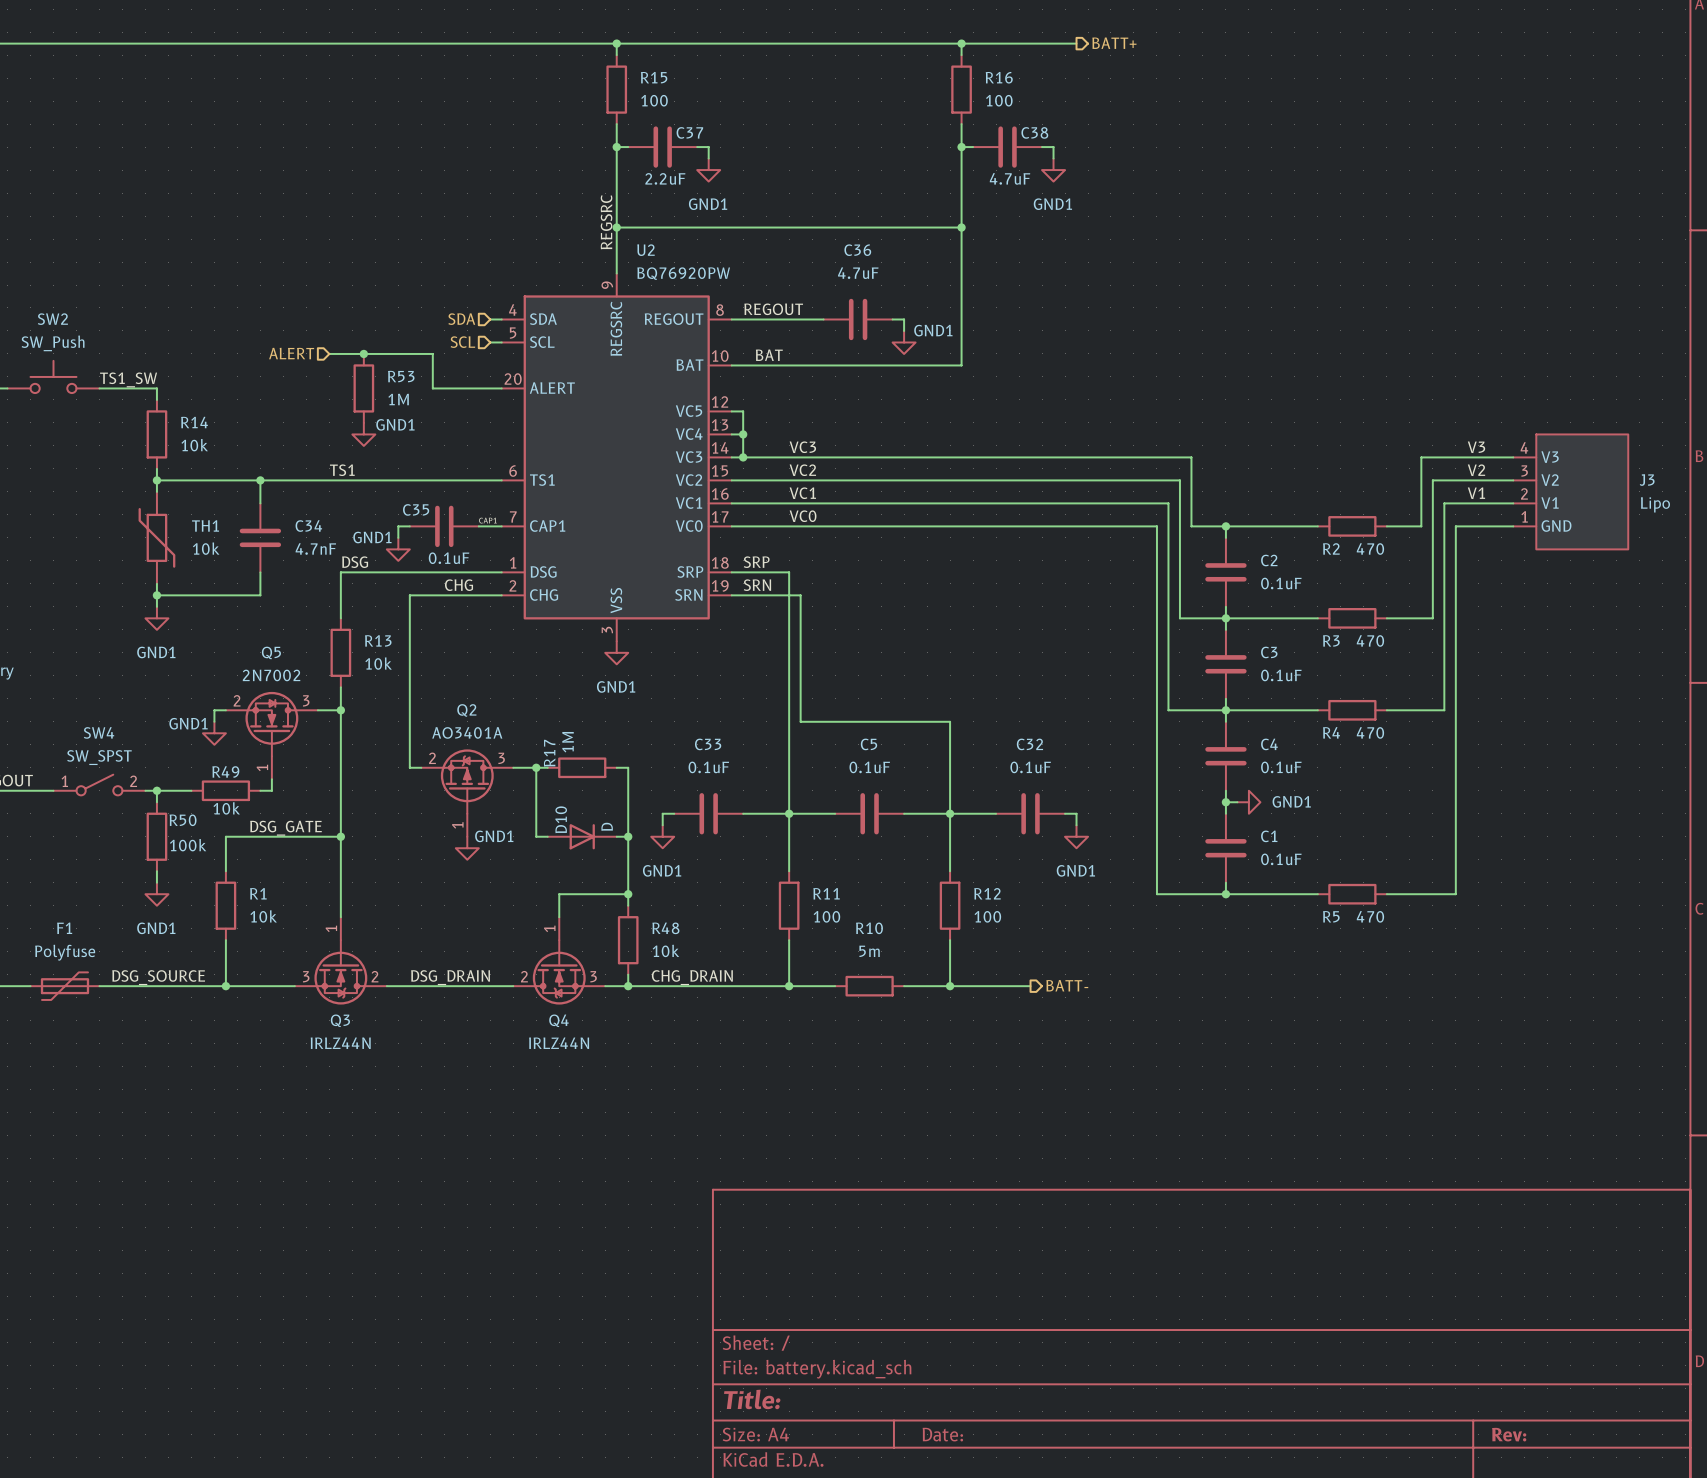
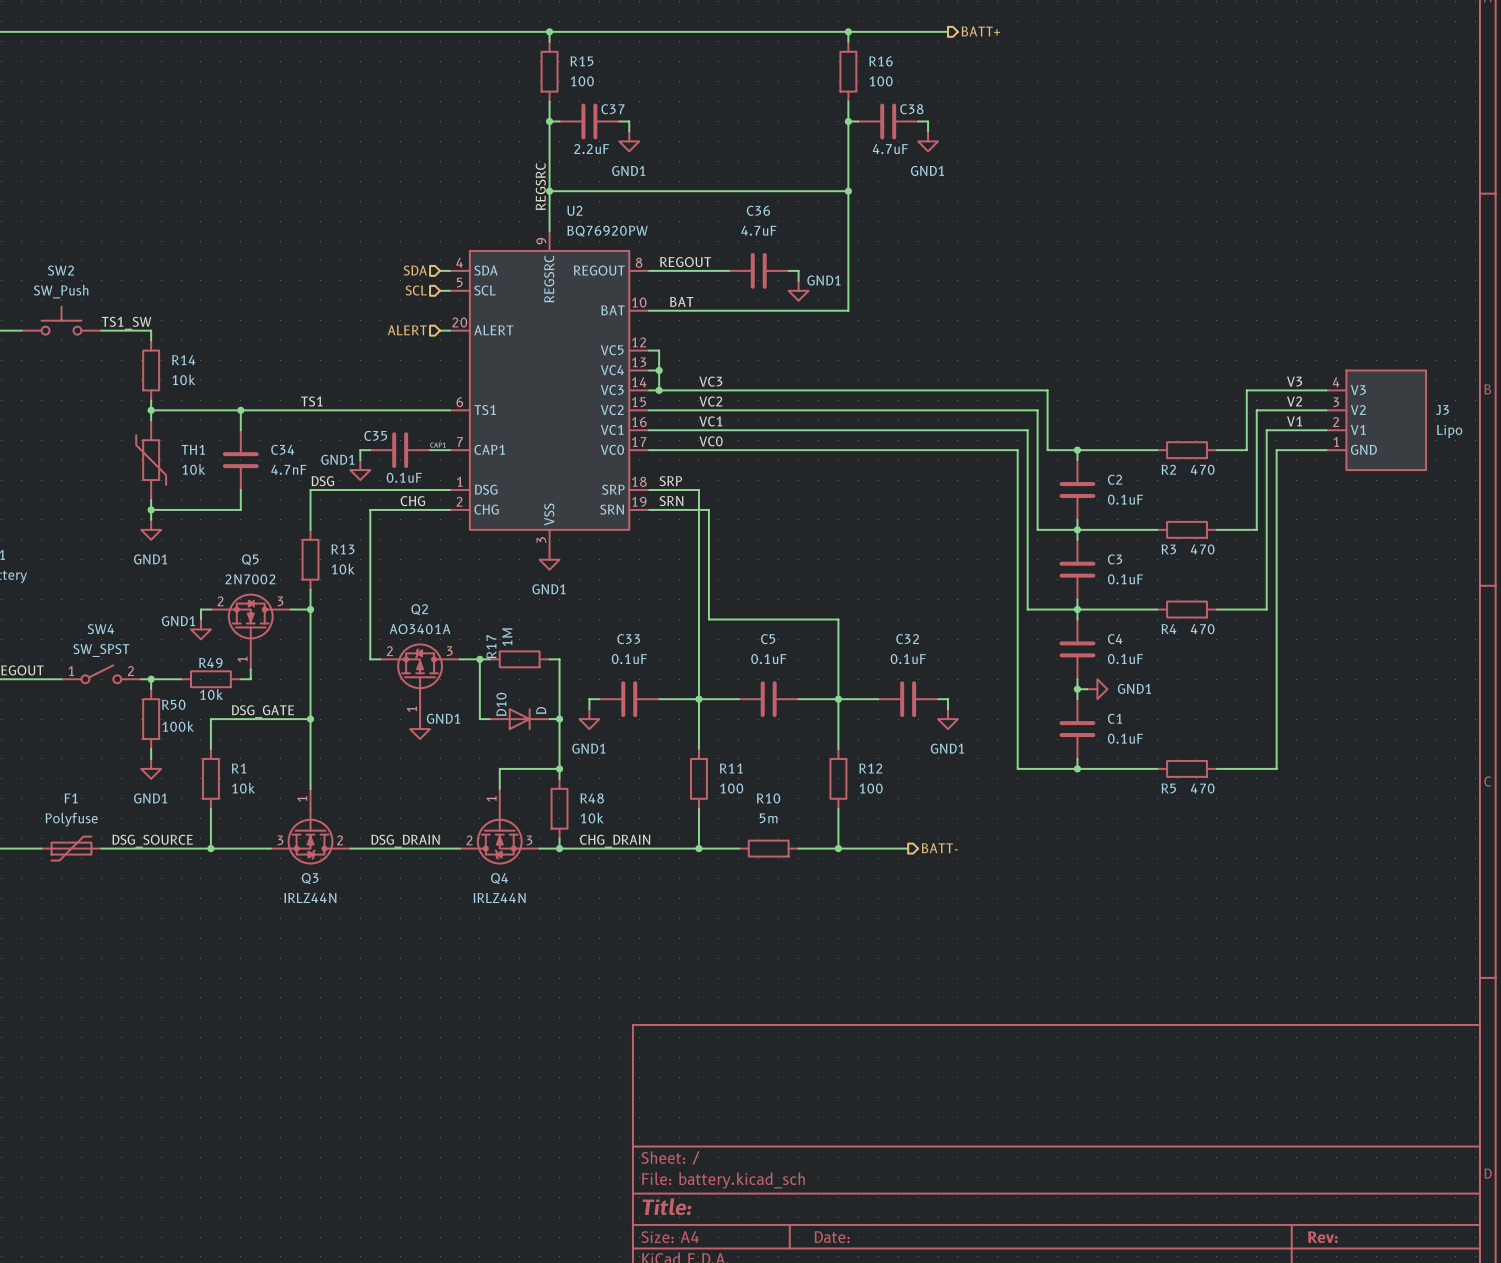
hierarchical label position: ALERT (291, 353) -> ALERT (407, 330)
wire: (329, 353) (432, 353) (432, 388) (490, 388) -> none
junction: (363, 353) -> none
R53: 1M (363, 388) -> none
power symbol: GND1 (363, 434) -> none

